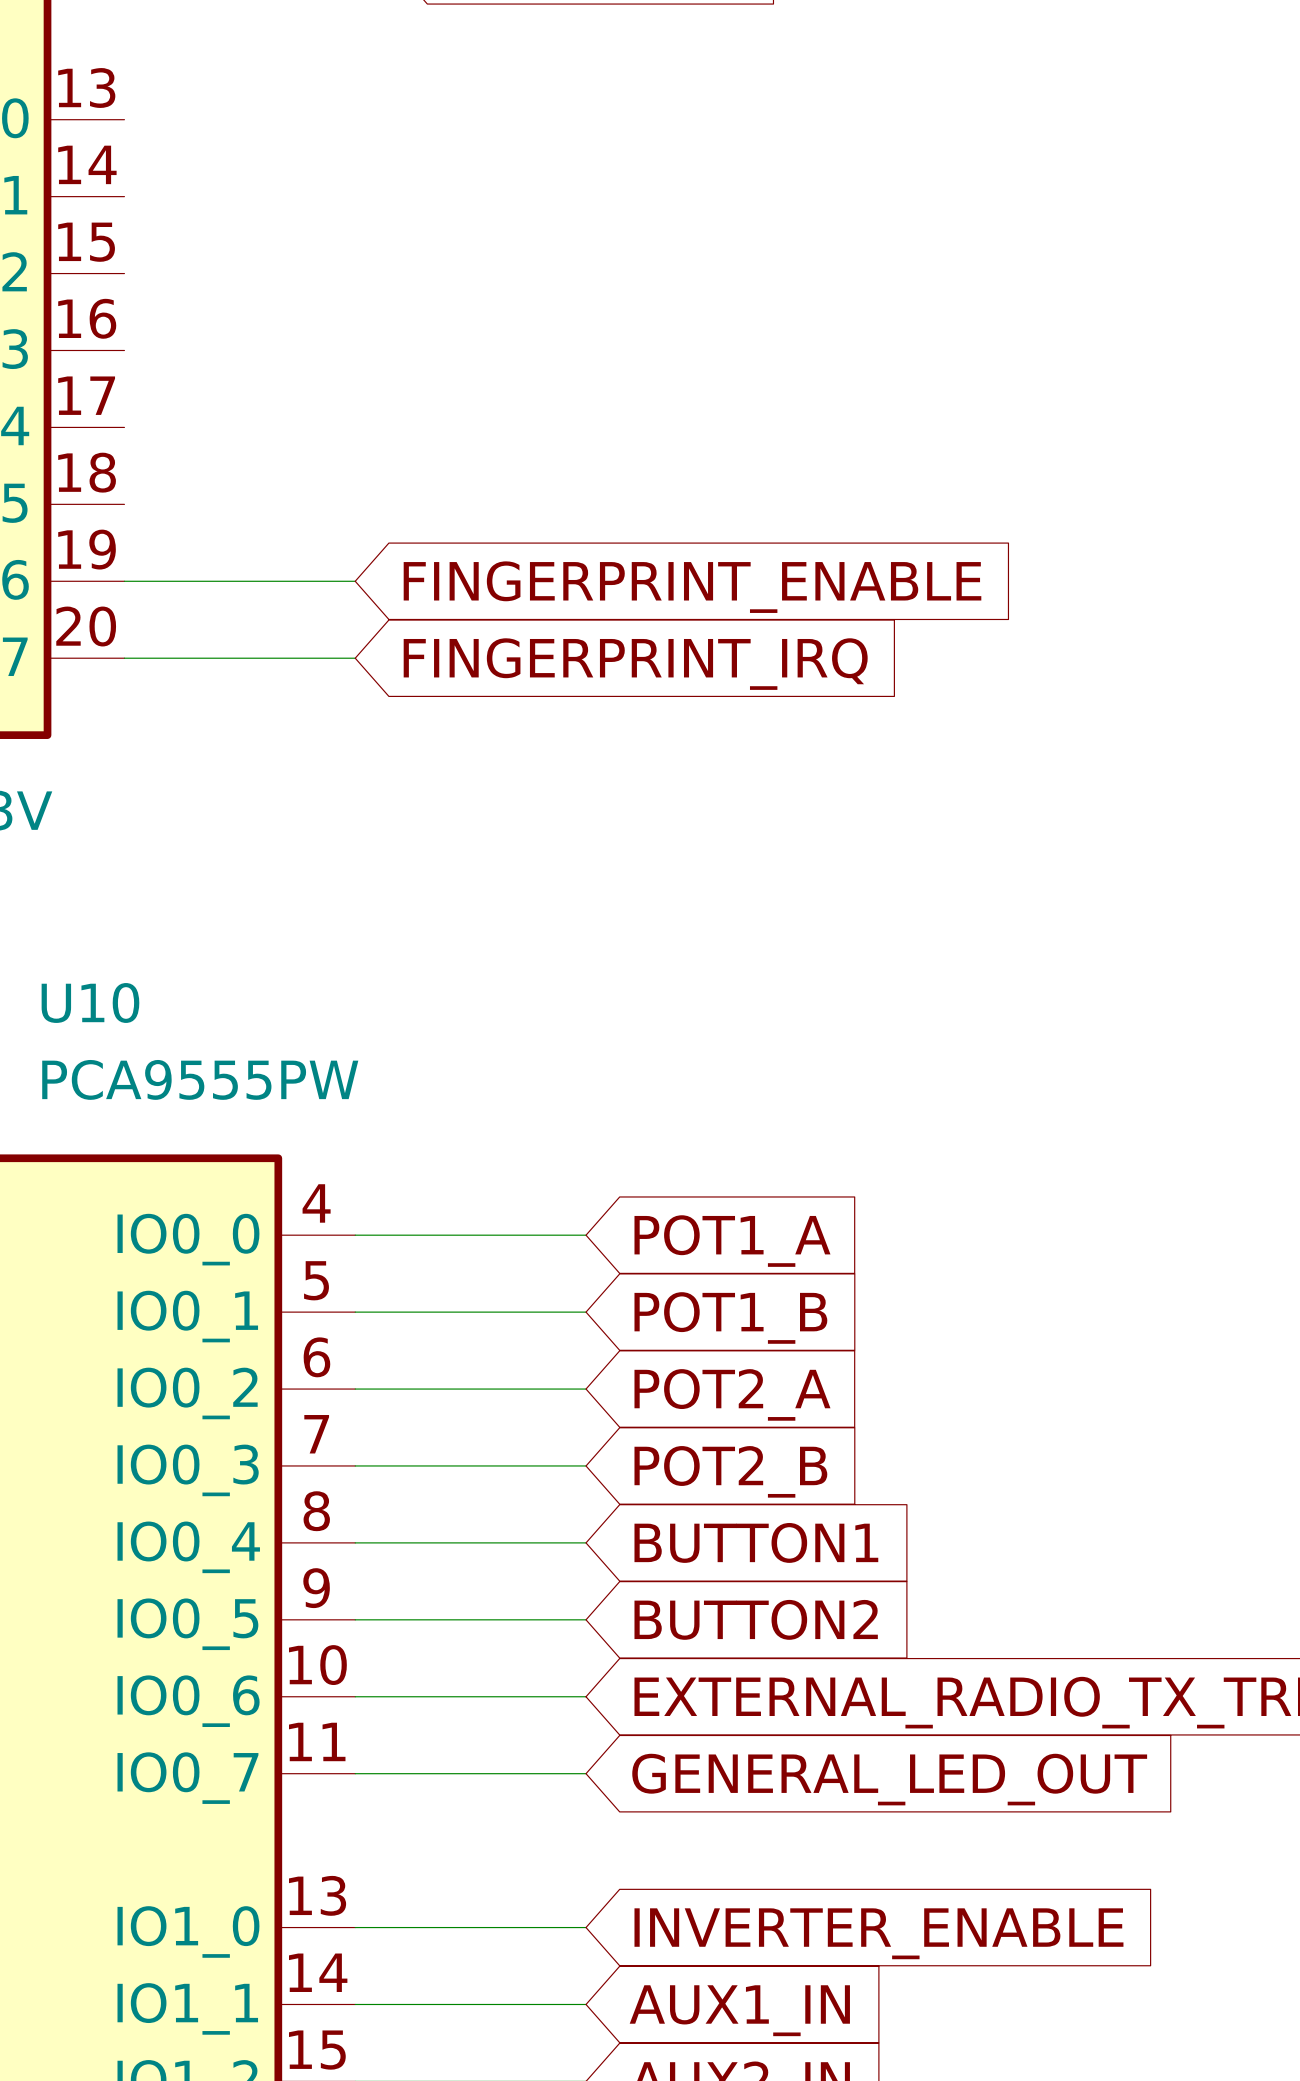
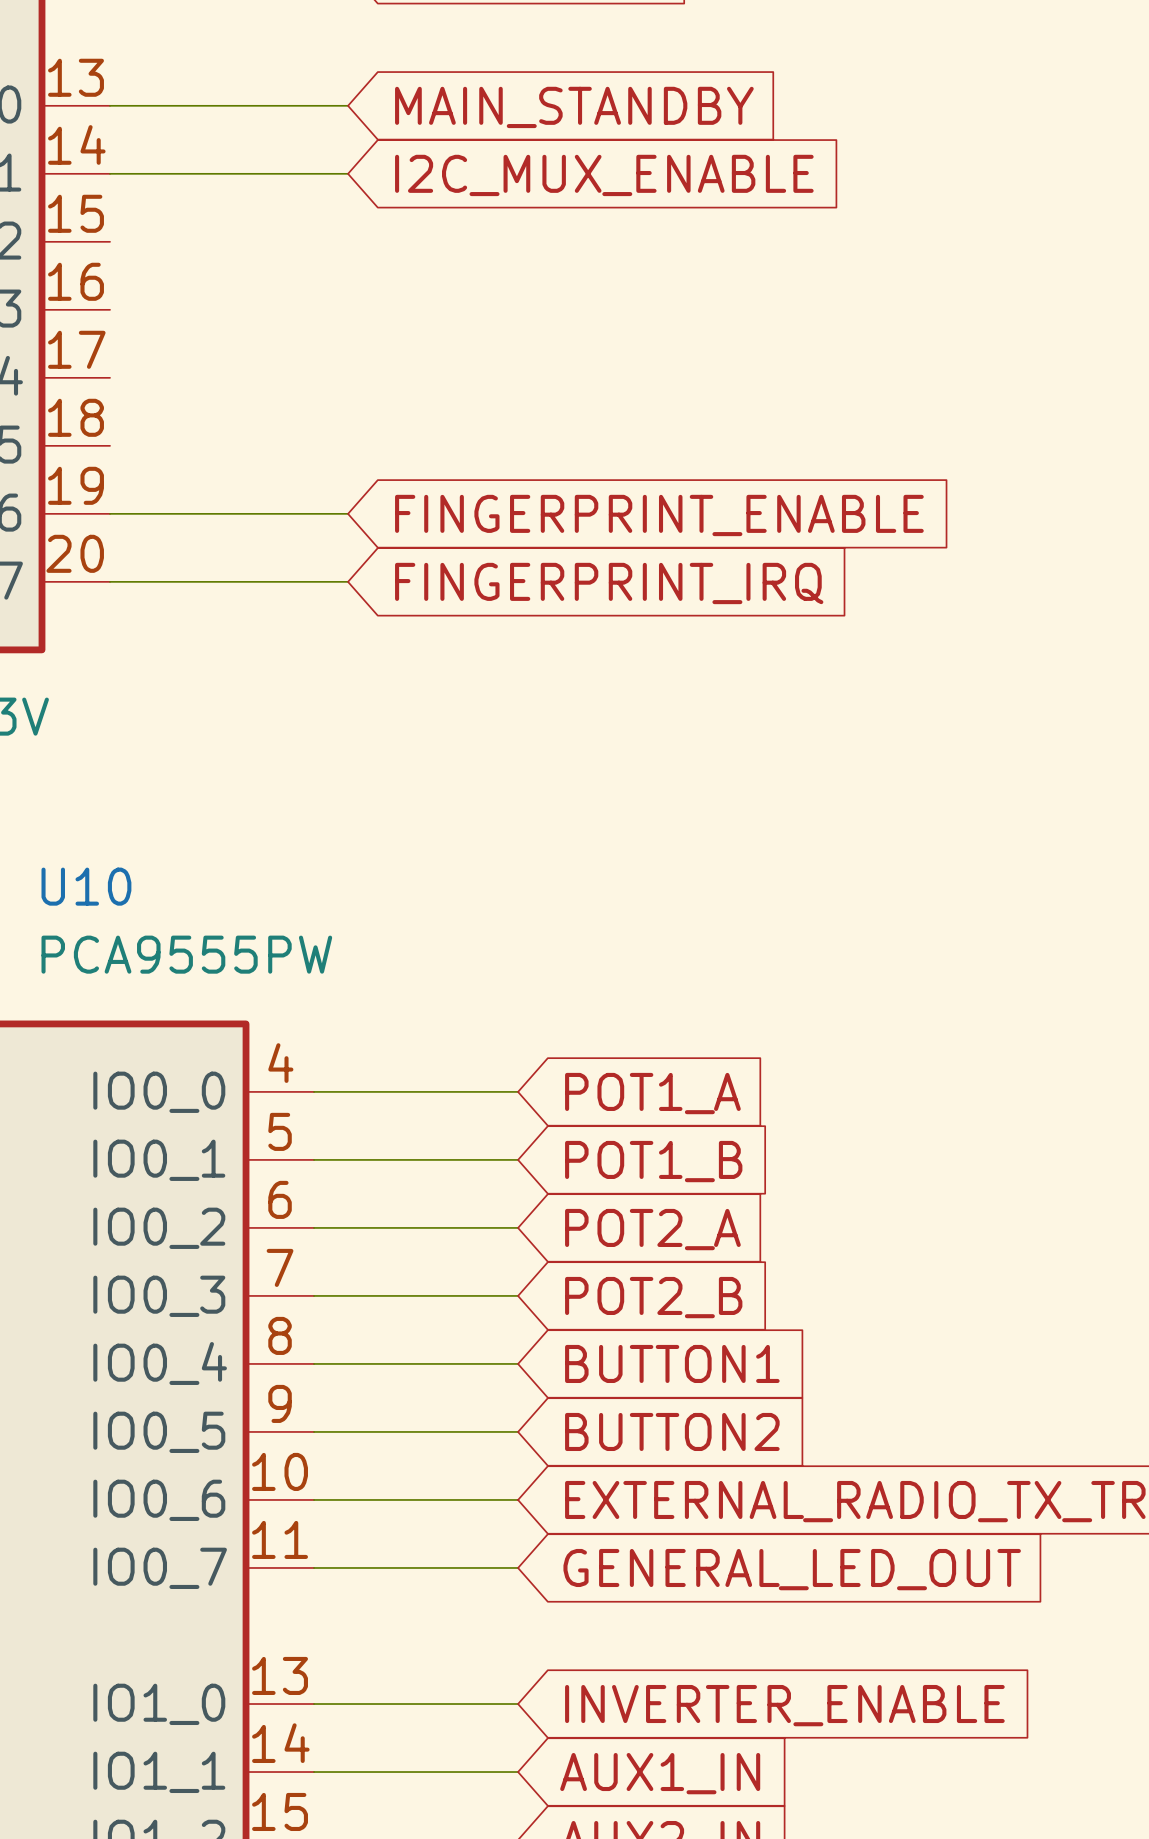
wire: none -> (110, 105) (348, 105)
global label: none -> MAIN_STANDBY (574, 107)
wire: none -> (110, 173) (348, 173)
global label: none -> I2C_MUX_ENABLE (604, 175)
wire: none -> (314, 513) (348, 513)
global label position: FINGERPRINT_ENABLE (692, 587) -> FINGERPRINT_ENABLE (659, 515)
wire: none -> (314, 581) (348, 581)
global label position: FINGERPRINT_IRQ (635, 664) -> FINGERPRINT_IRQ (609, 583)

